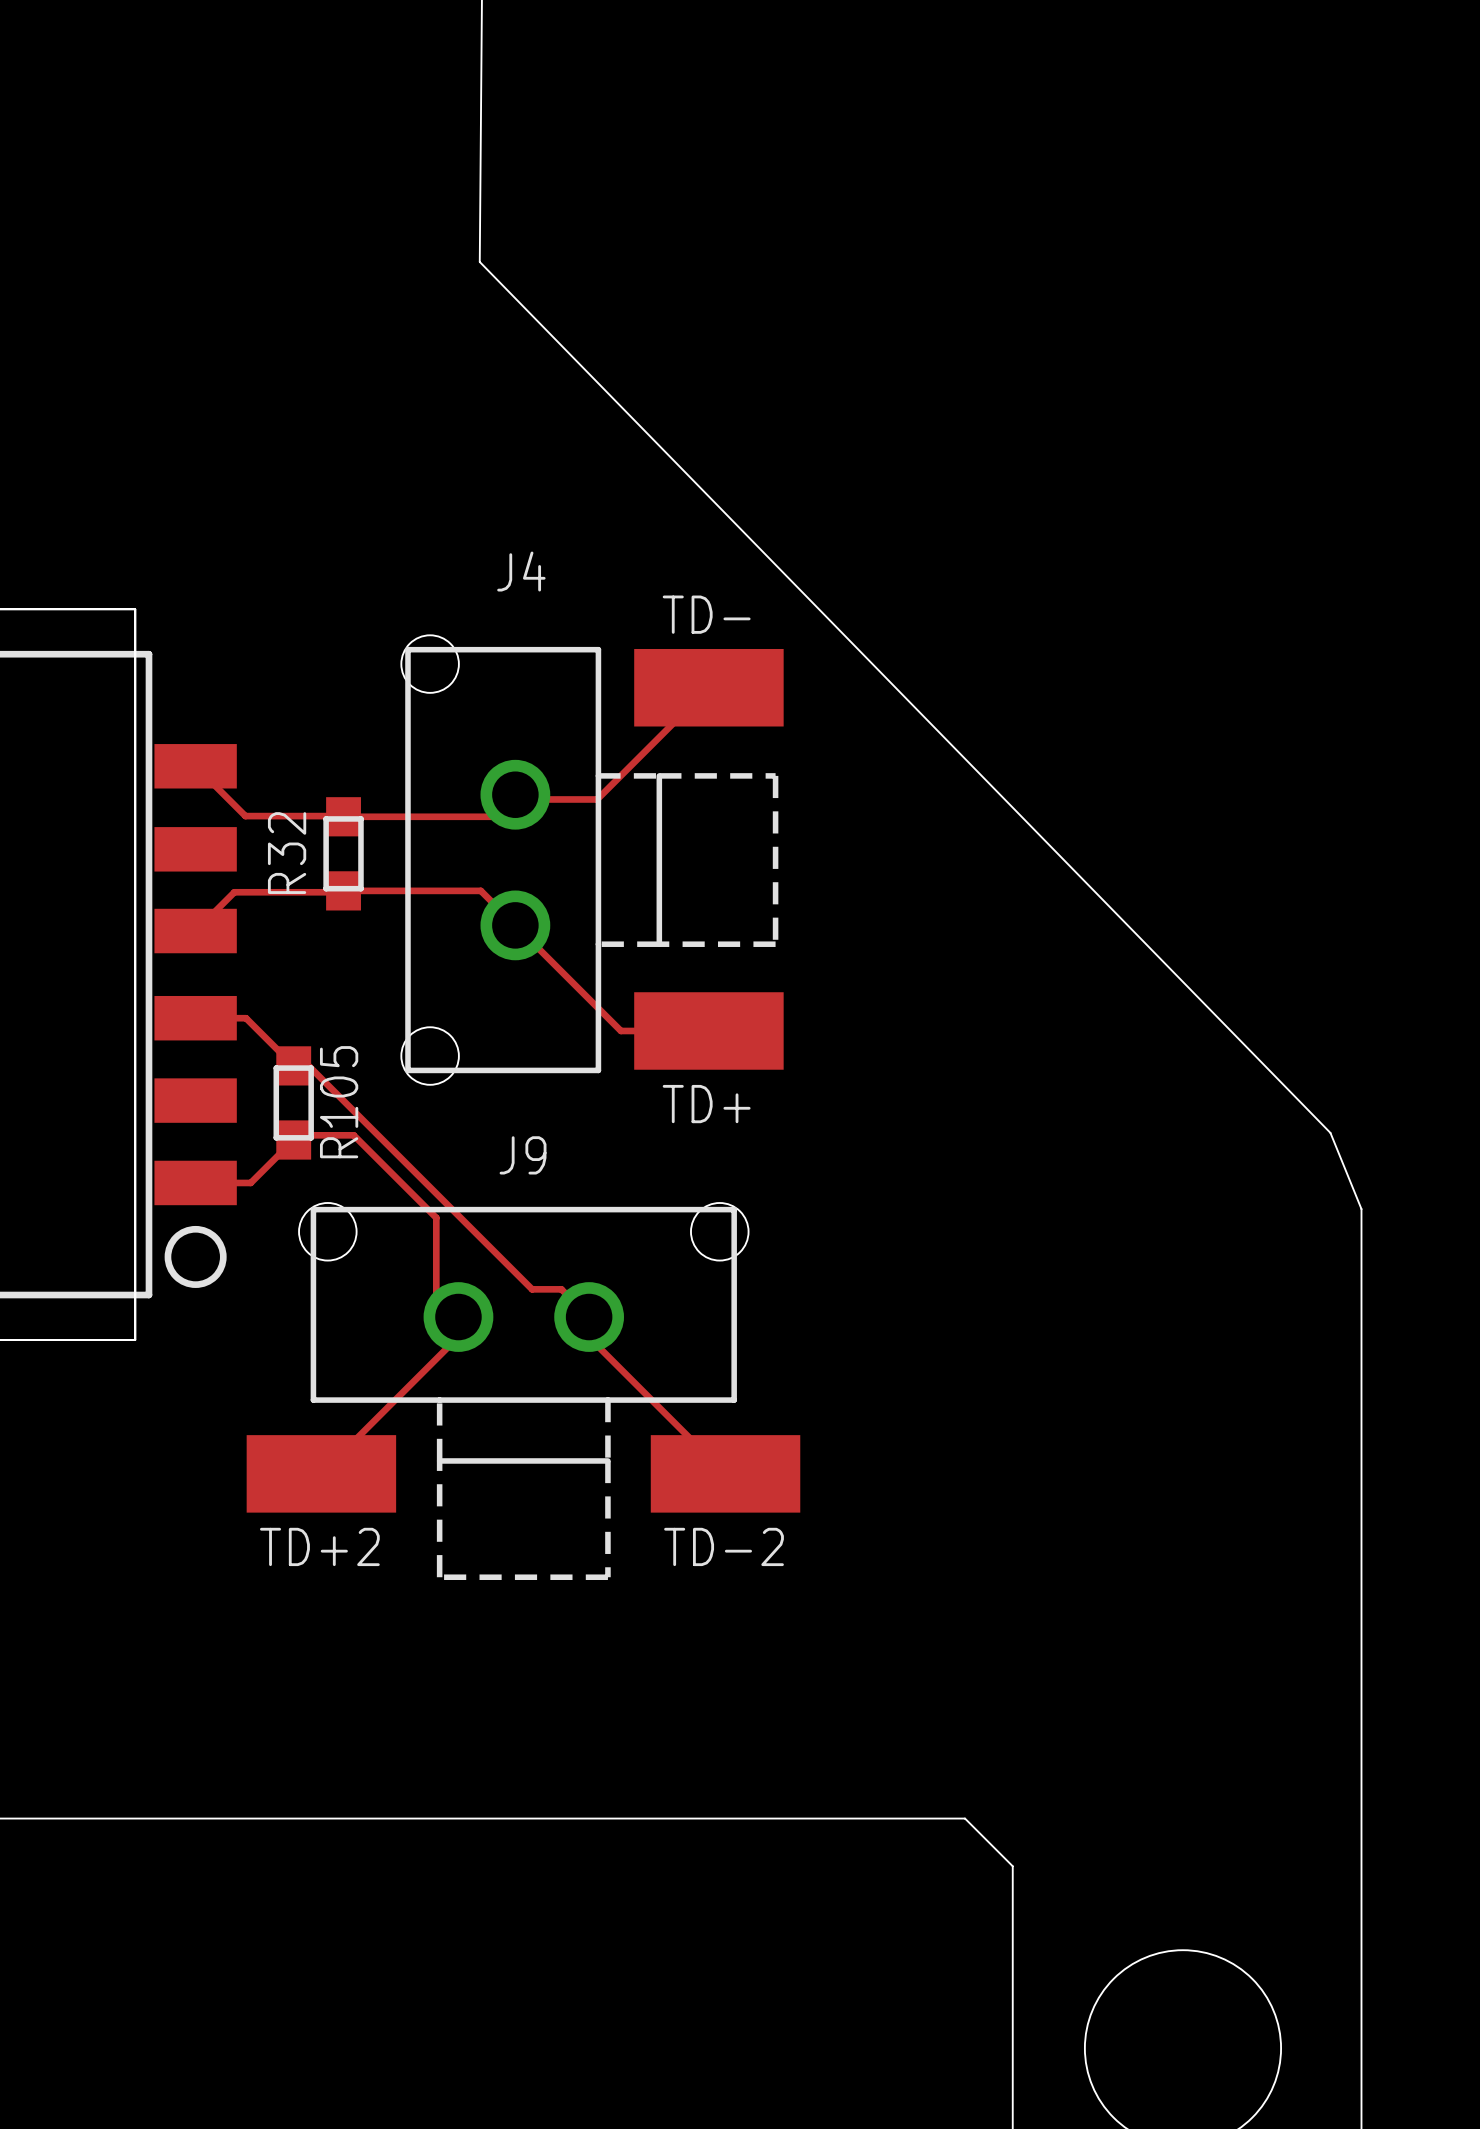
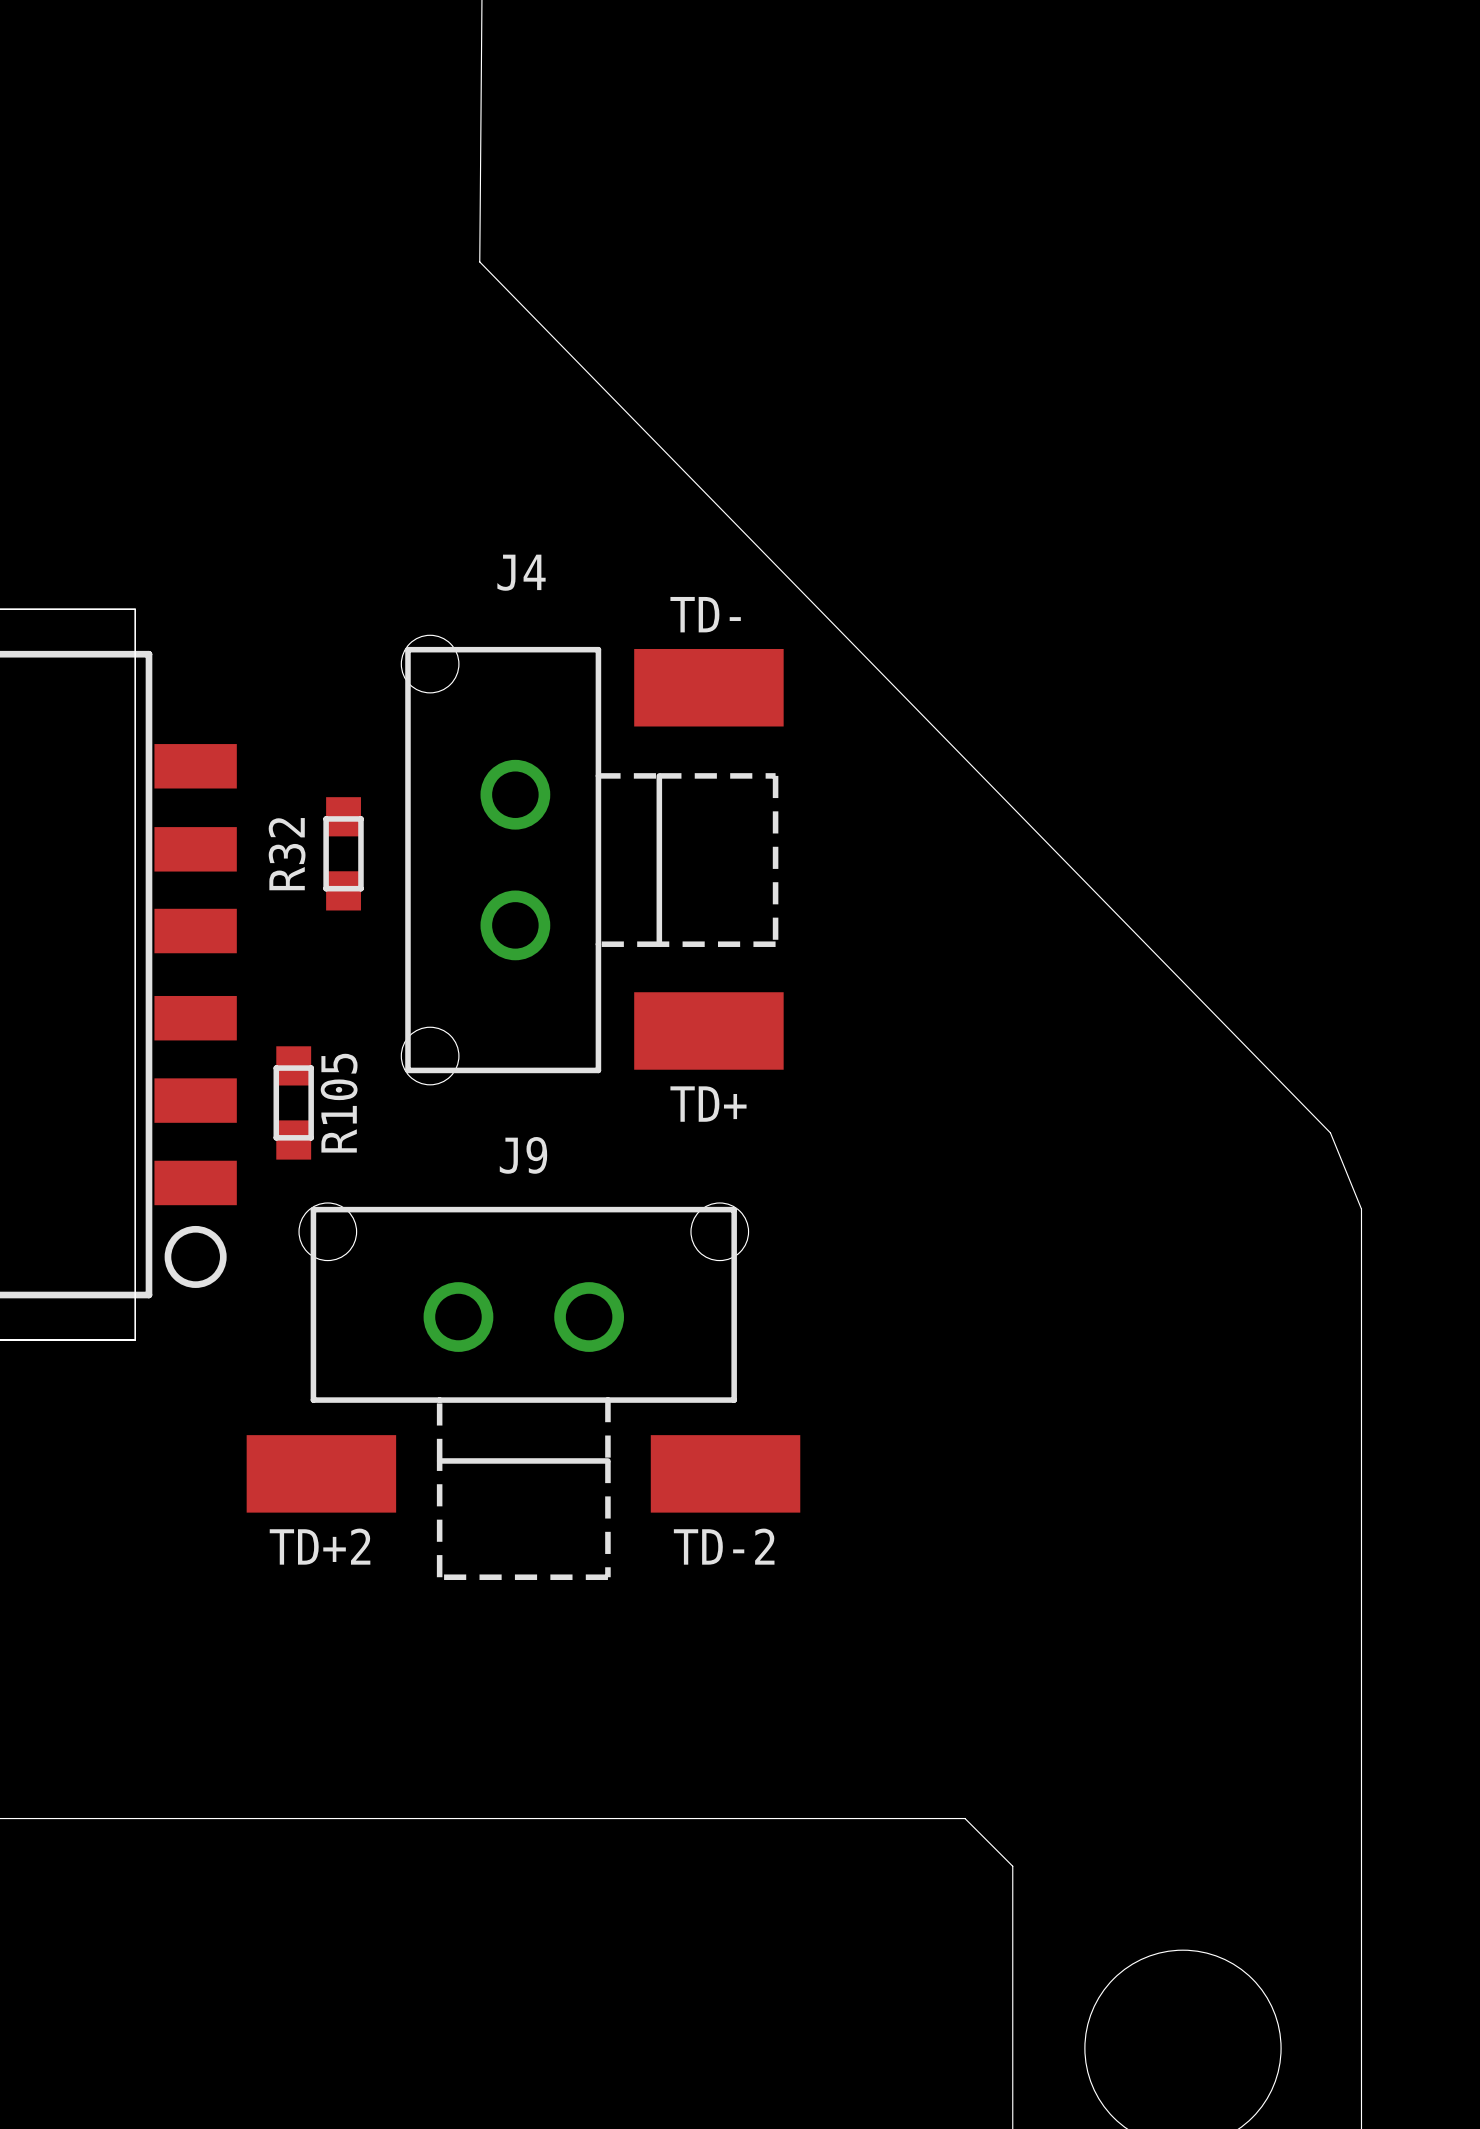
track: (708, 687) (597, 799) (510, 799) -> none
track: (195, 766) (245, 816) (493, 816) (515, 794) -> none
track: (195, 931) (234, 892) (480, 890) (620, 1030) (708, 1030) -> none
track: (195, 1018) (246, 1018) (293, 1065) (293, 1071) -> none
track: (293, 1066) (309, 1066) (532, 1289) (561, 1289) (589, 1317) -> none
track: (293, 1140) (250, 1182) (195, 1182) -> none
track: (298, 1144) (289, 1135) (353, 1135) (436, 1217) (436, 1294) (458, 1317) (458, 1336) (321, 1473) -> none
track: (586, 1314) (586, 1334) (725, 1473) -> none

